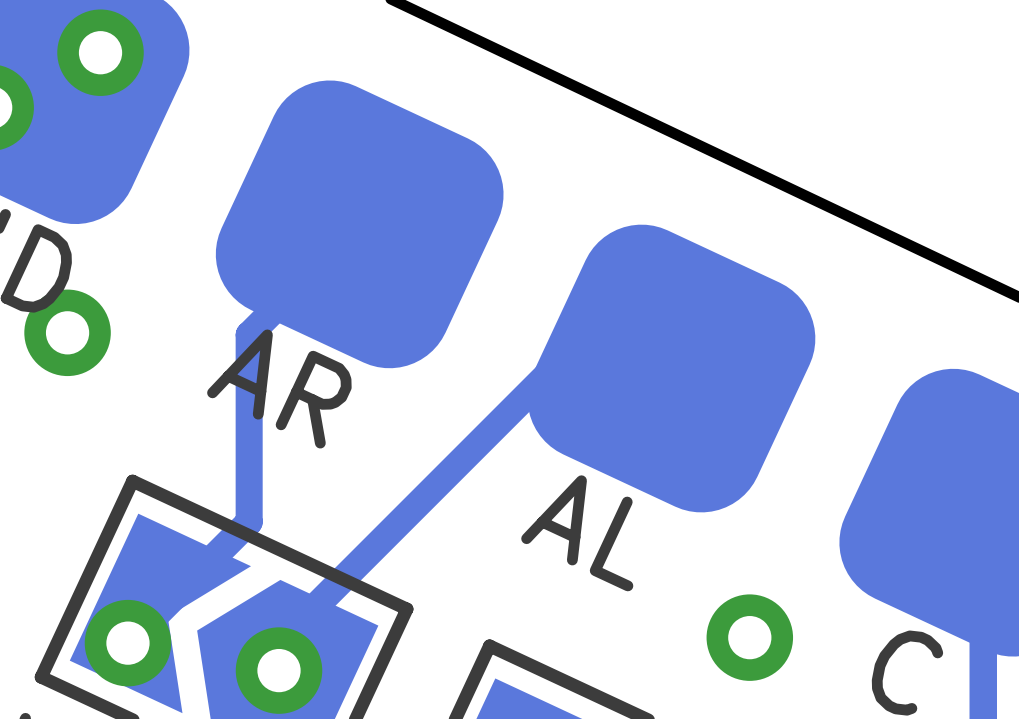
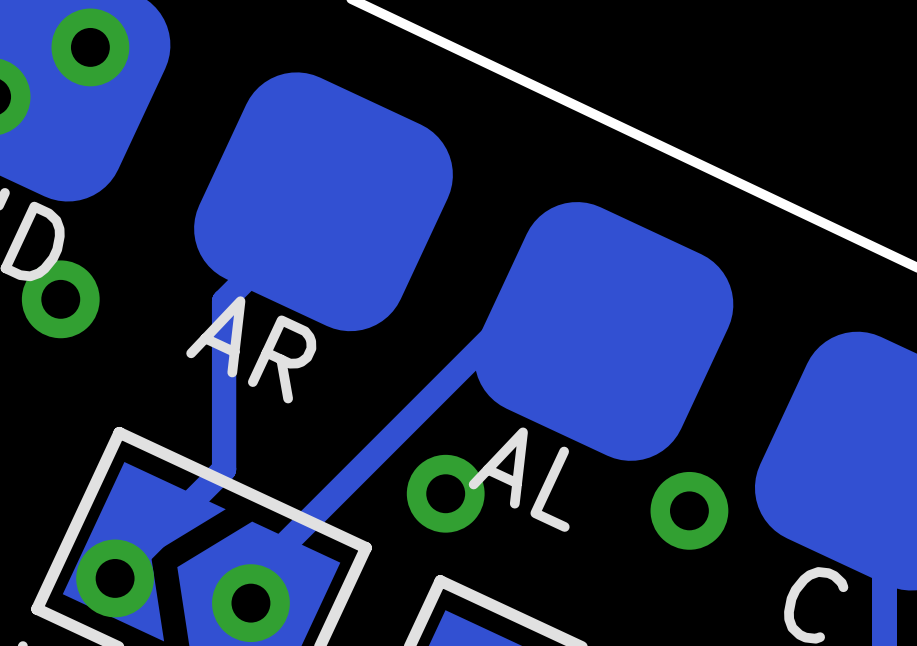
via: none -> (445, 493)
via position: (749, 637) -> (689, 510)

